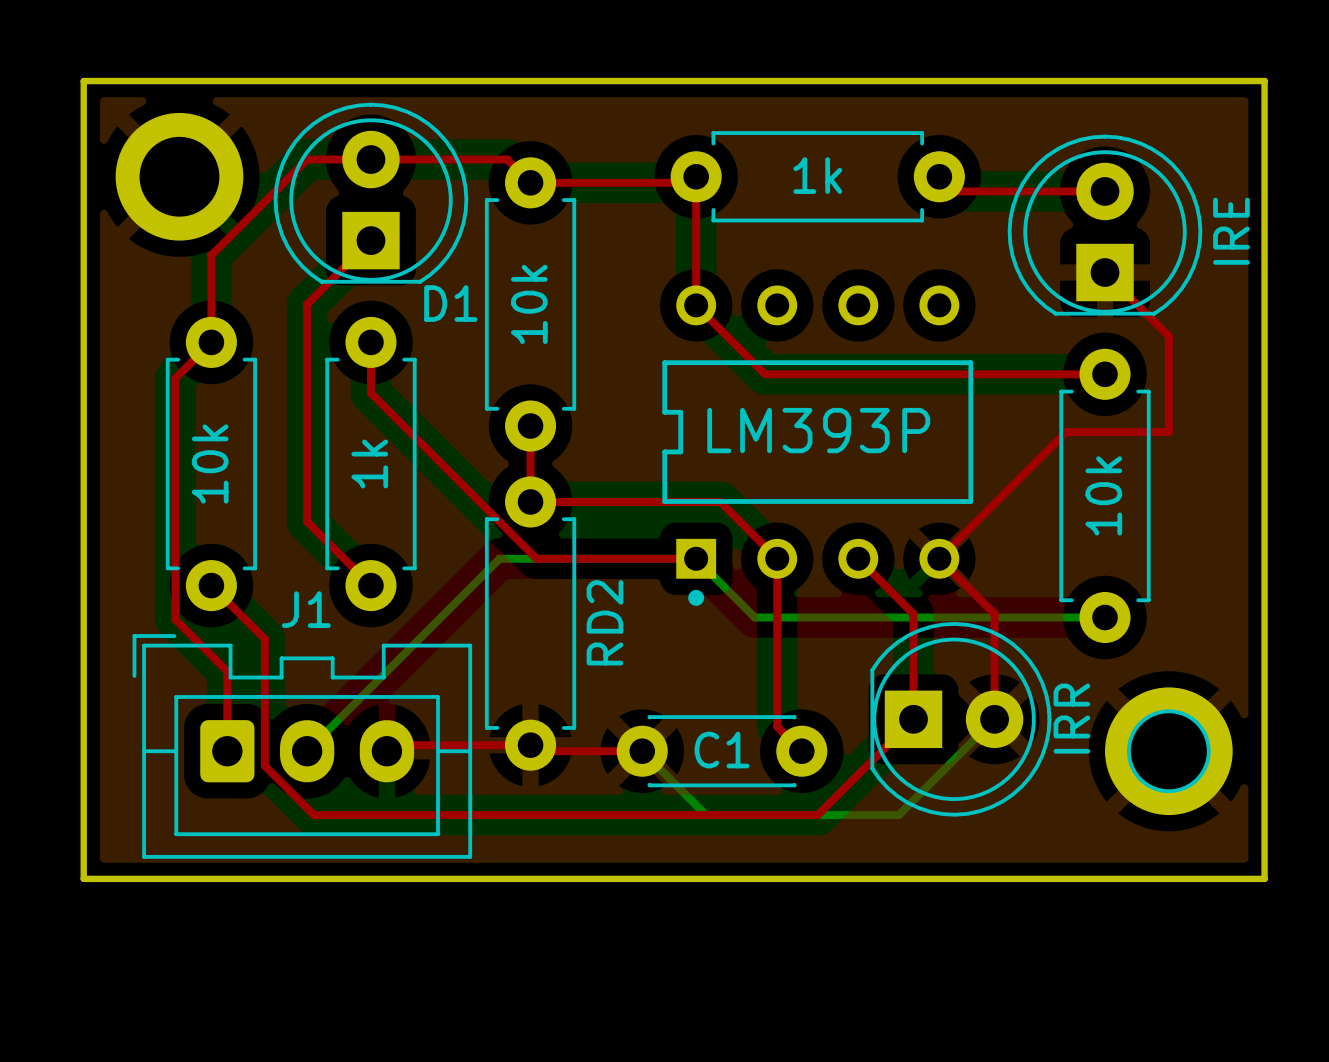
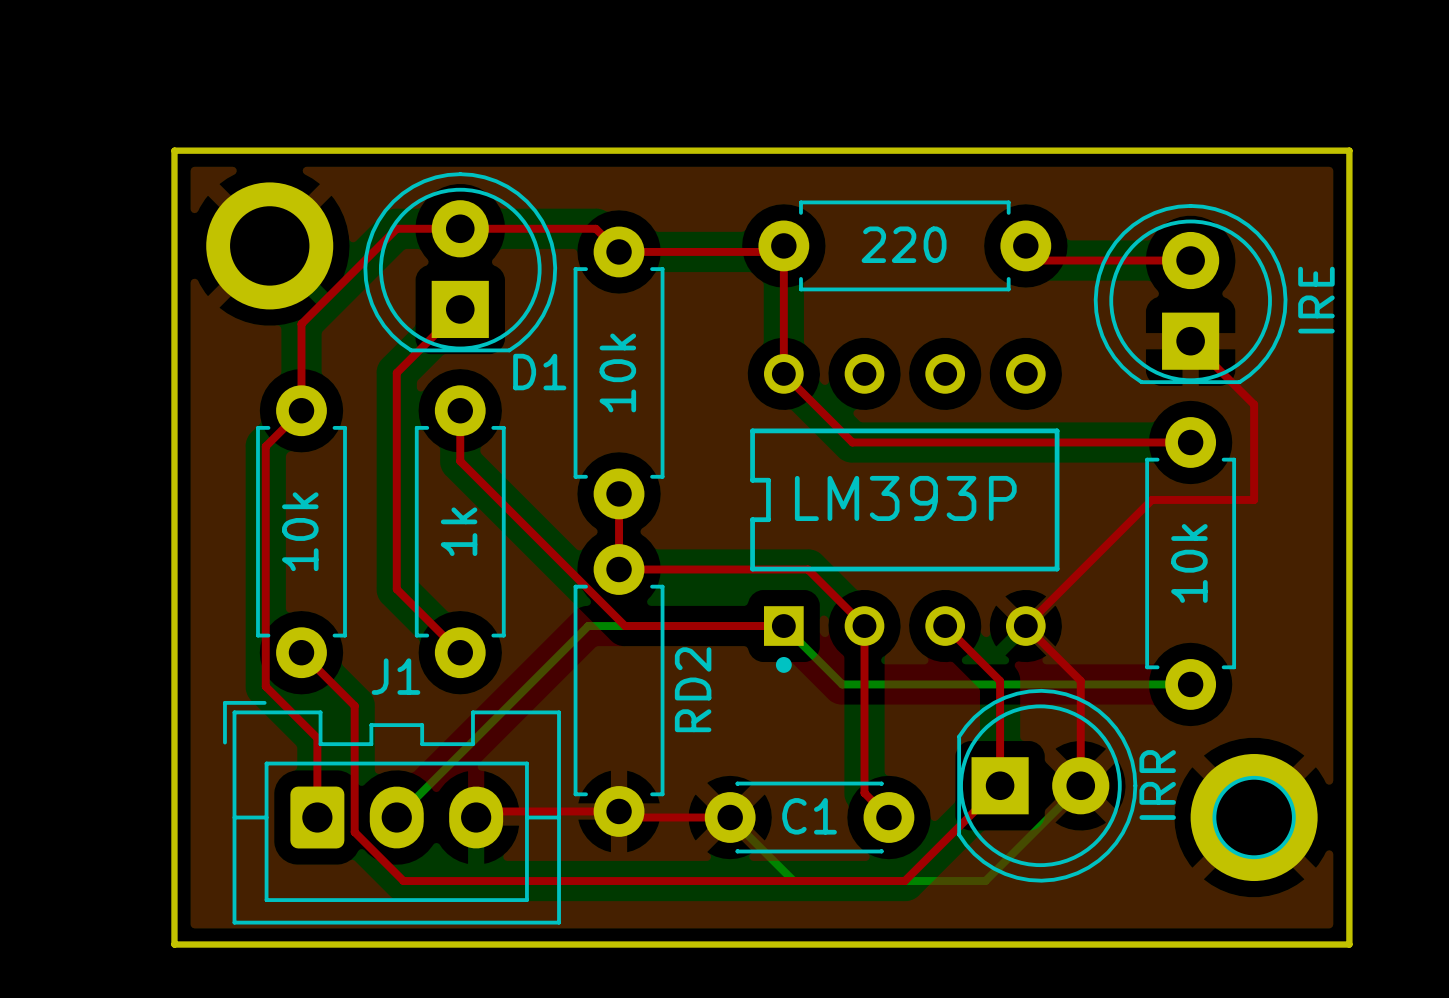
1k name: 1k (817, 175) -> 220 (904, 244)

